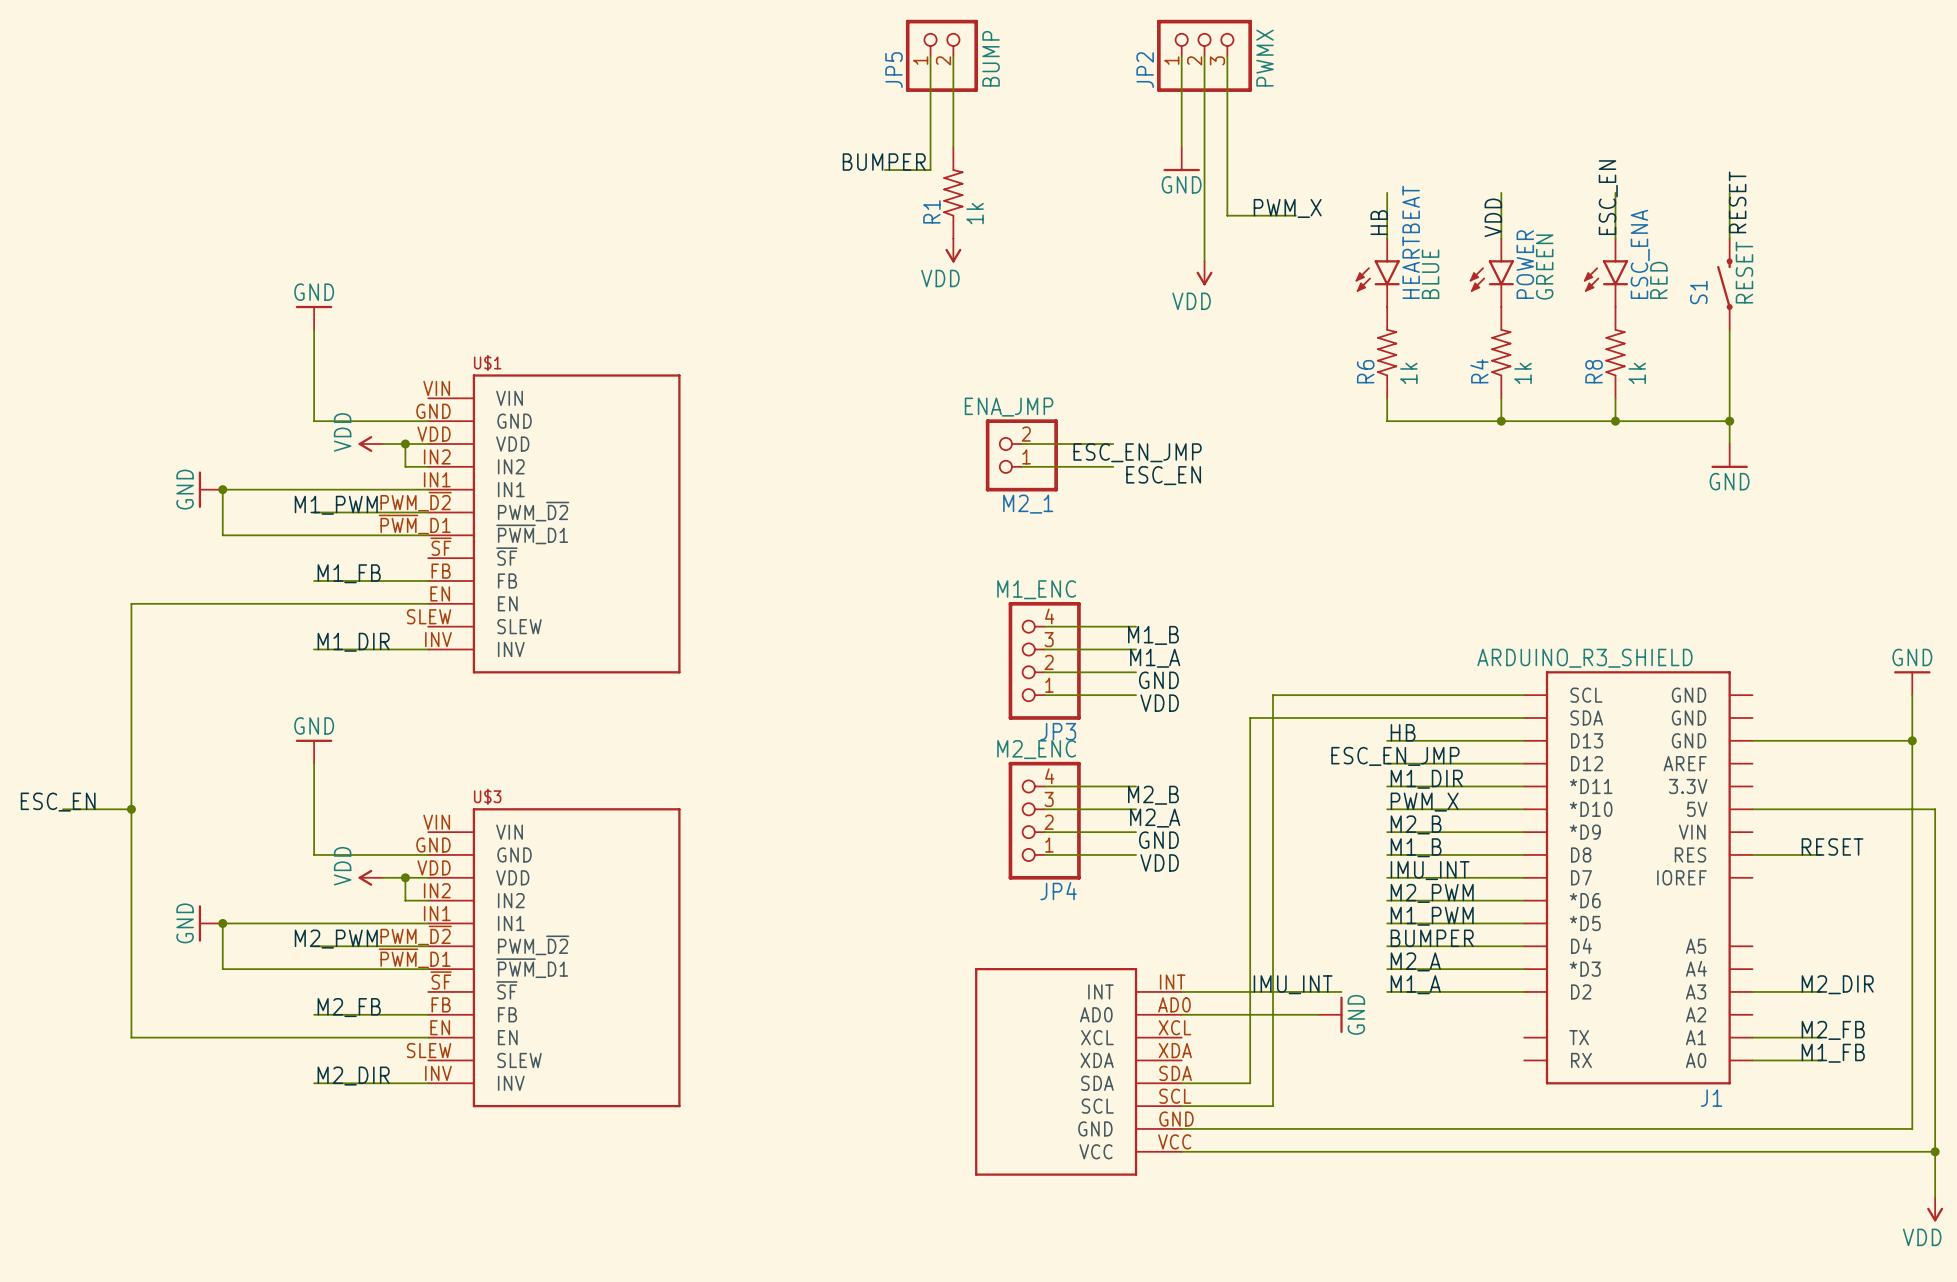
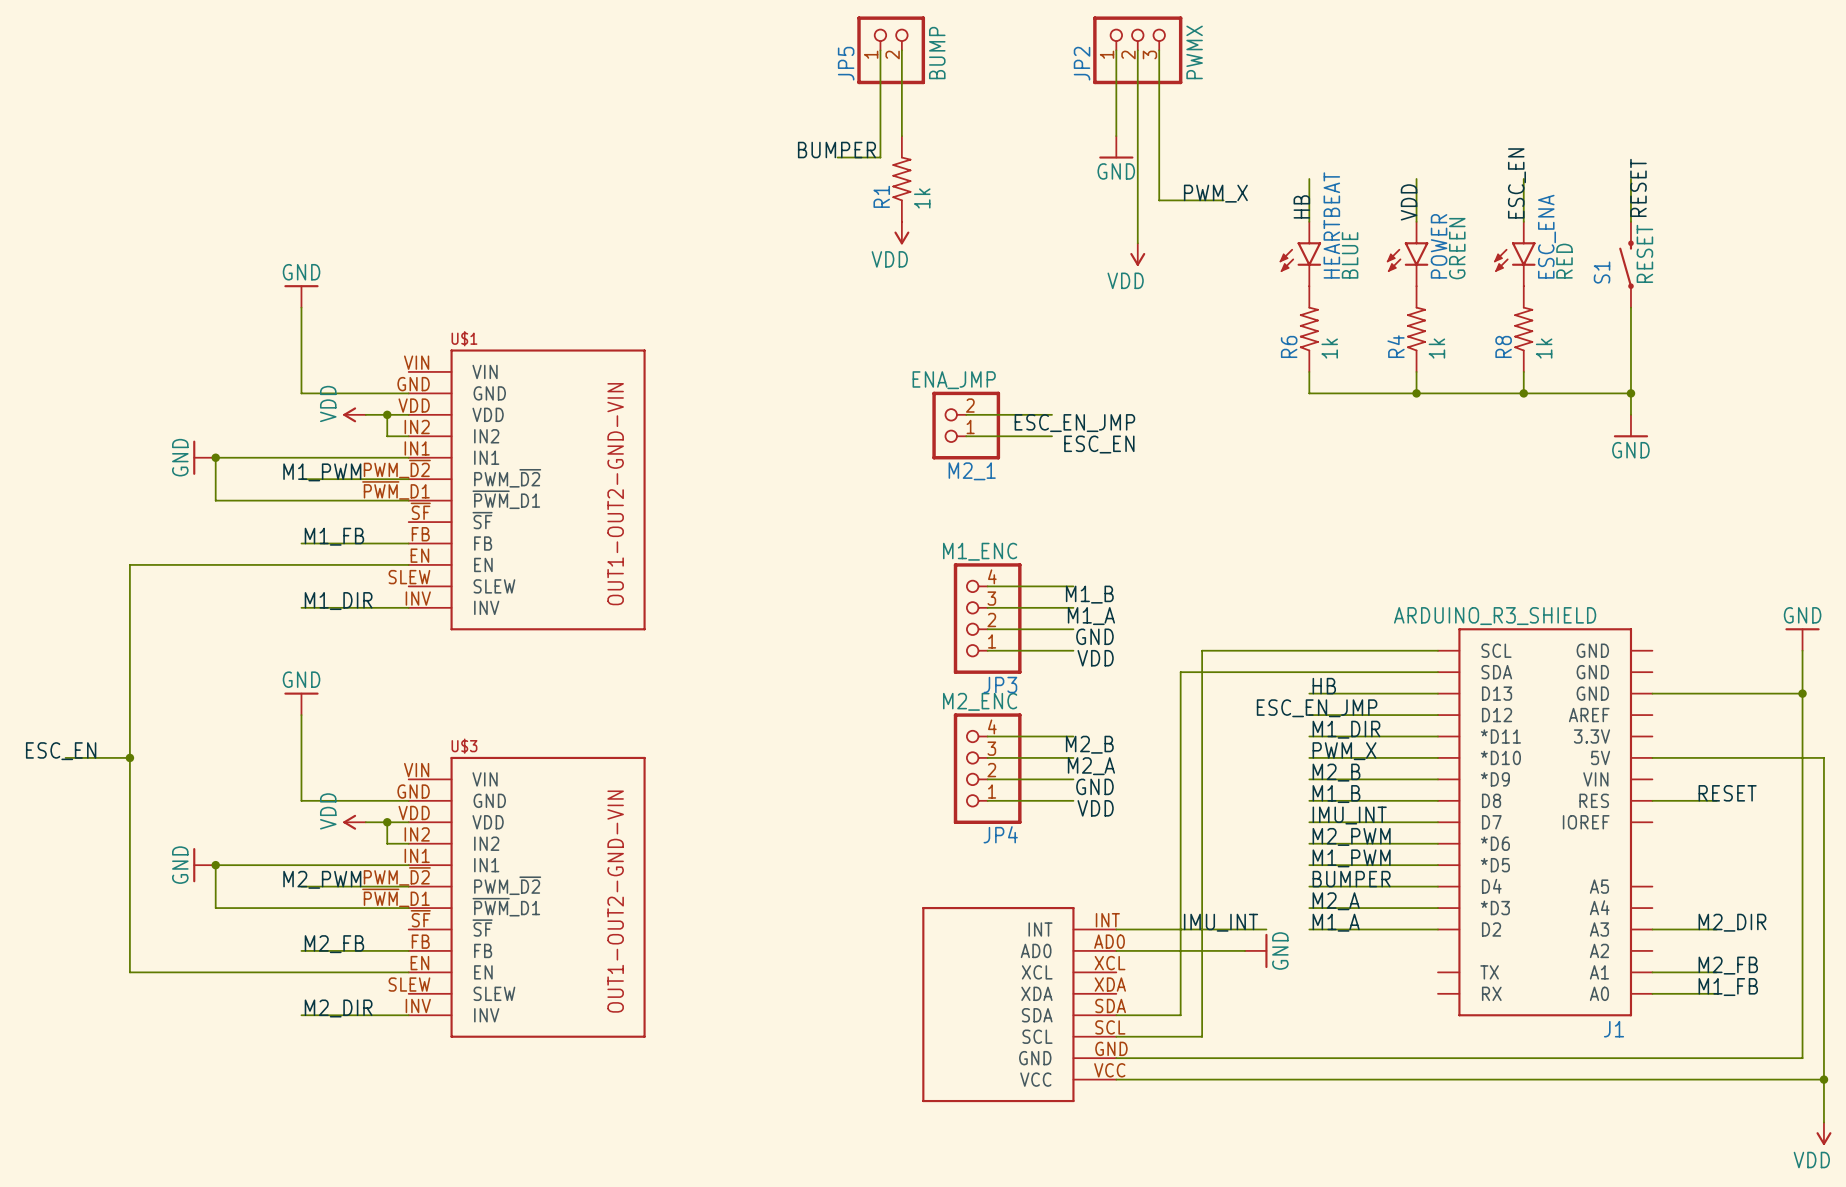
U$1 text: none -> OUT1-OUT2-GND-VIN (615, 494)
U$3 text: none -> OUT1-OUT2-GND-VIN (615, 901)

